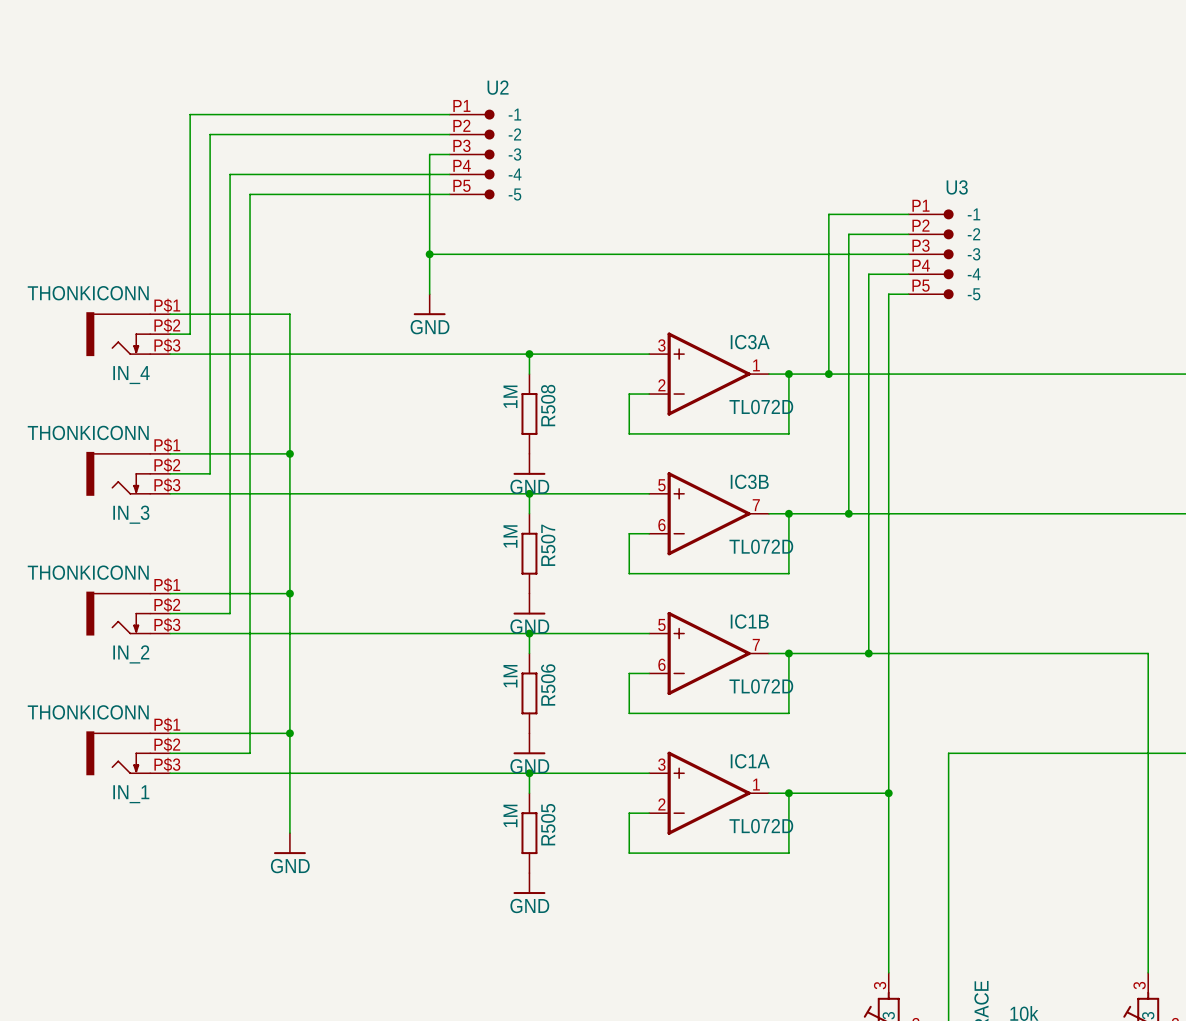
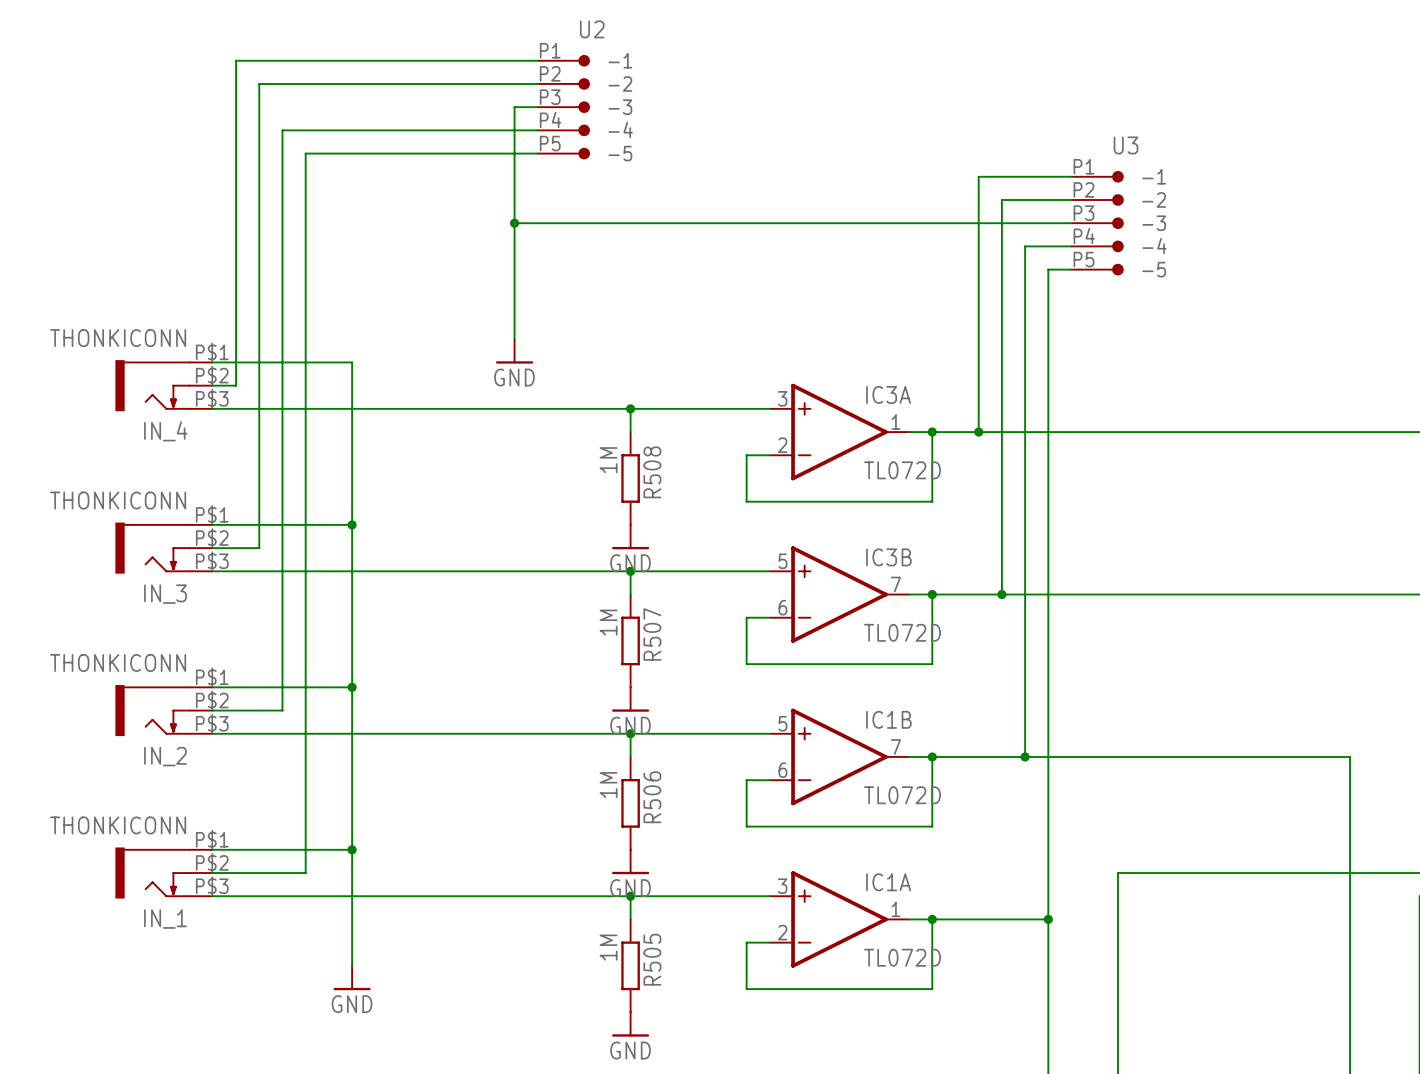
wire: none -> (537, 60) (236, 60) (236, 130)
wire: none -> (537, 83) (259, 83) (259, 153)
wire: (190, 114) (230, 114) -> (282, 199) (282, 130)
wire: (210, 134) (250, 134) -> (305, 223) (305, 153)
wire: (429, 154) (449, 154) -> (514, 176) (514, 107) (537, 107)
U2 position: (472, 154) -> (563, 107)
wire: (230, 174) (449, 174) -> none
wire: (250, 194) (429, 194) -> none
junction: none -> (514, 223)
wire: none -> (537, 223) (1071, 223)
wire: (828, 214) (868, 214) -> (978, 246) (978, 176) (1071, 176)
wire: (848, 234) (888, 234) -> (1001, 269) (1001, 199) (1071, 199)
wire: (429, 254) (908, 254) -> none
junction: (429, 254) -> none
U3 position: (931, 254) -> (1097, 223)
wire: (868, 274) (908, 274) -> (1025, 316) (1025, 246)
wire: (888, 294) (908, 294) -> (1048, 339) (1048, 269)

